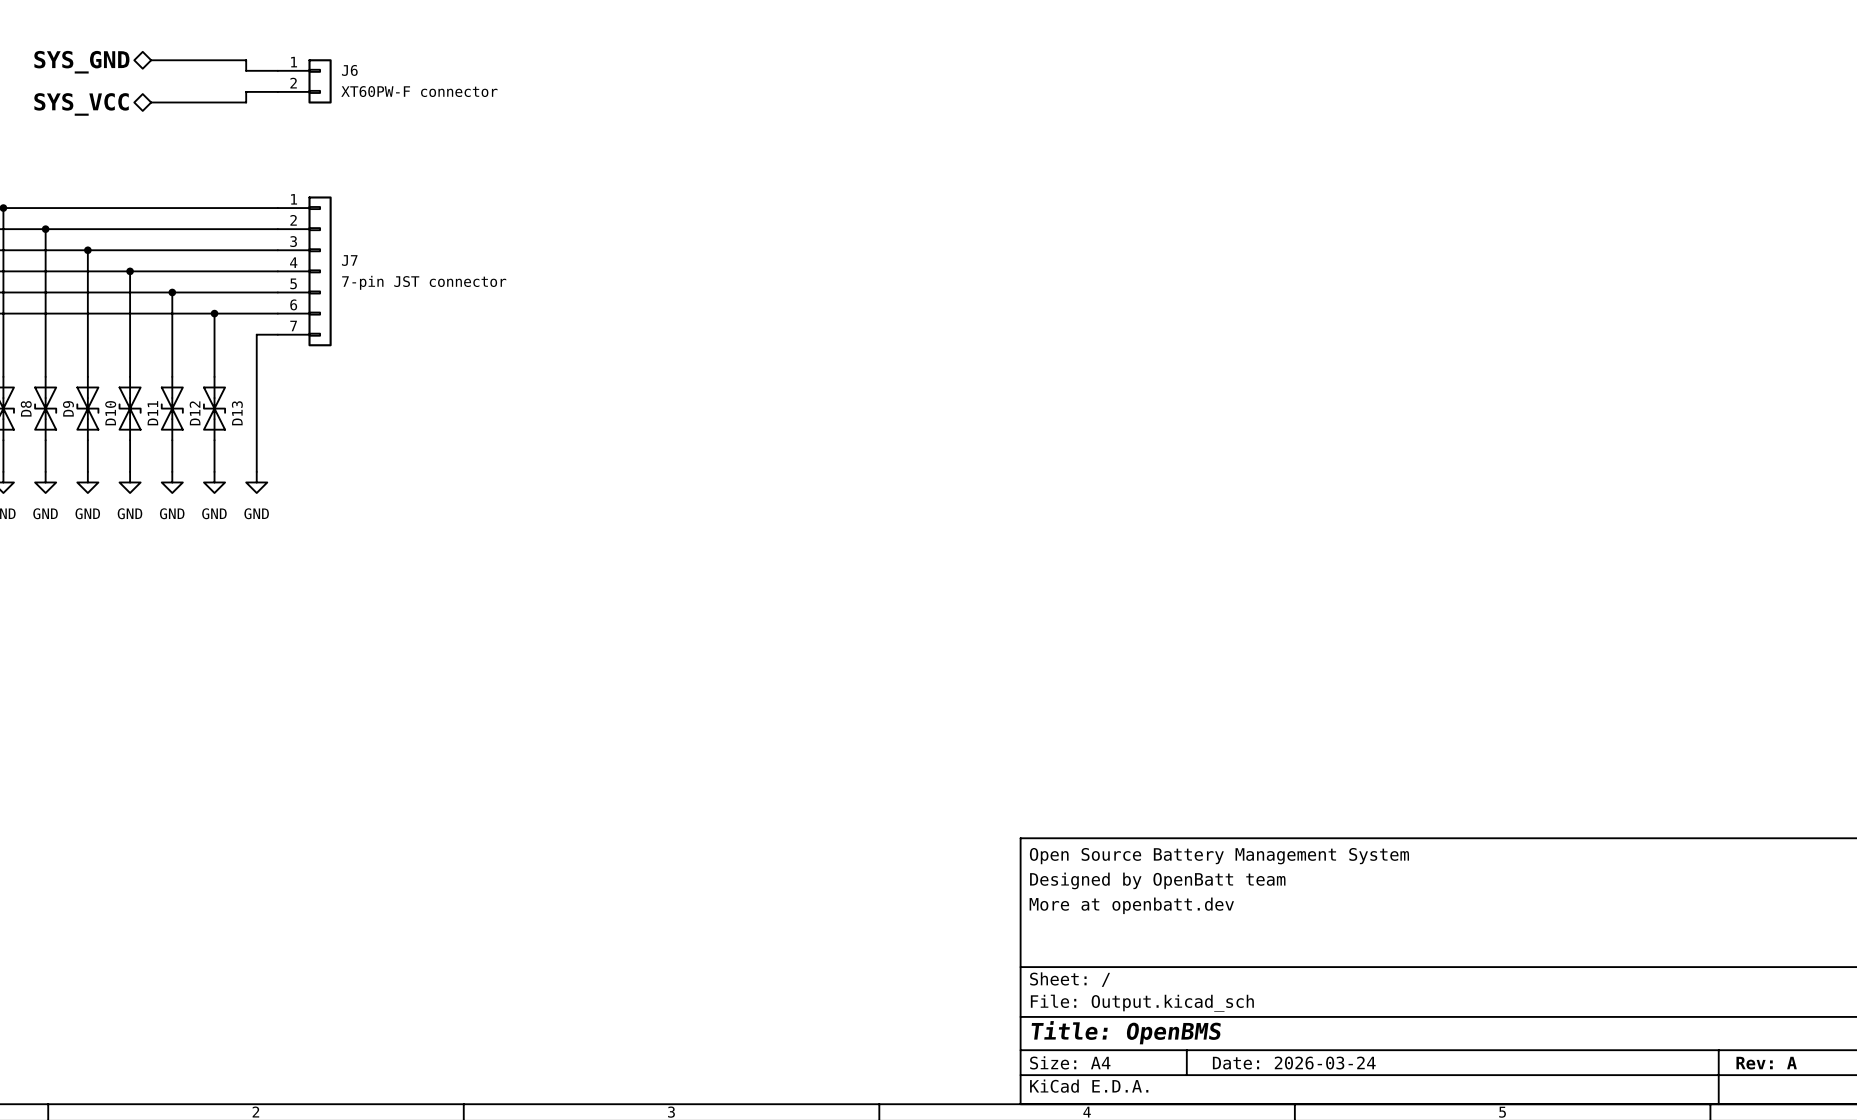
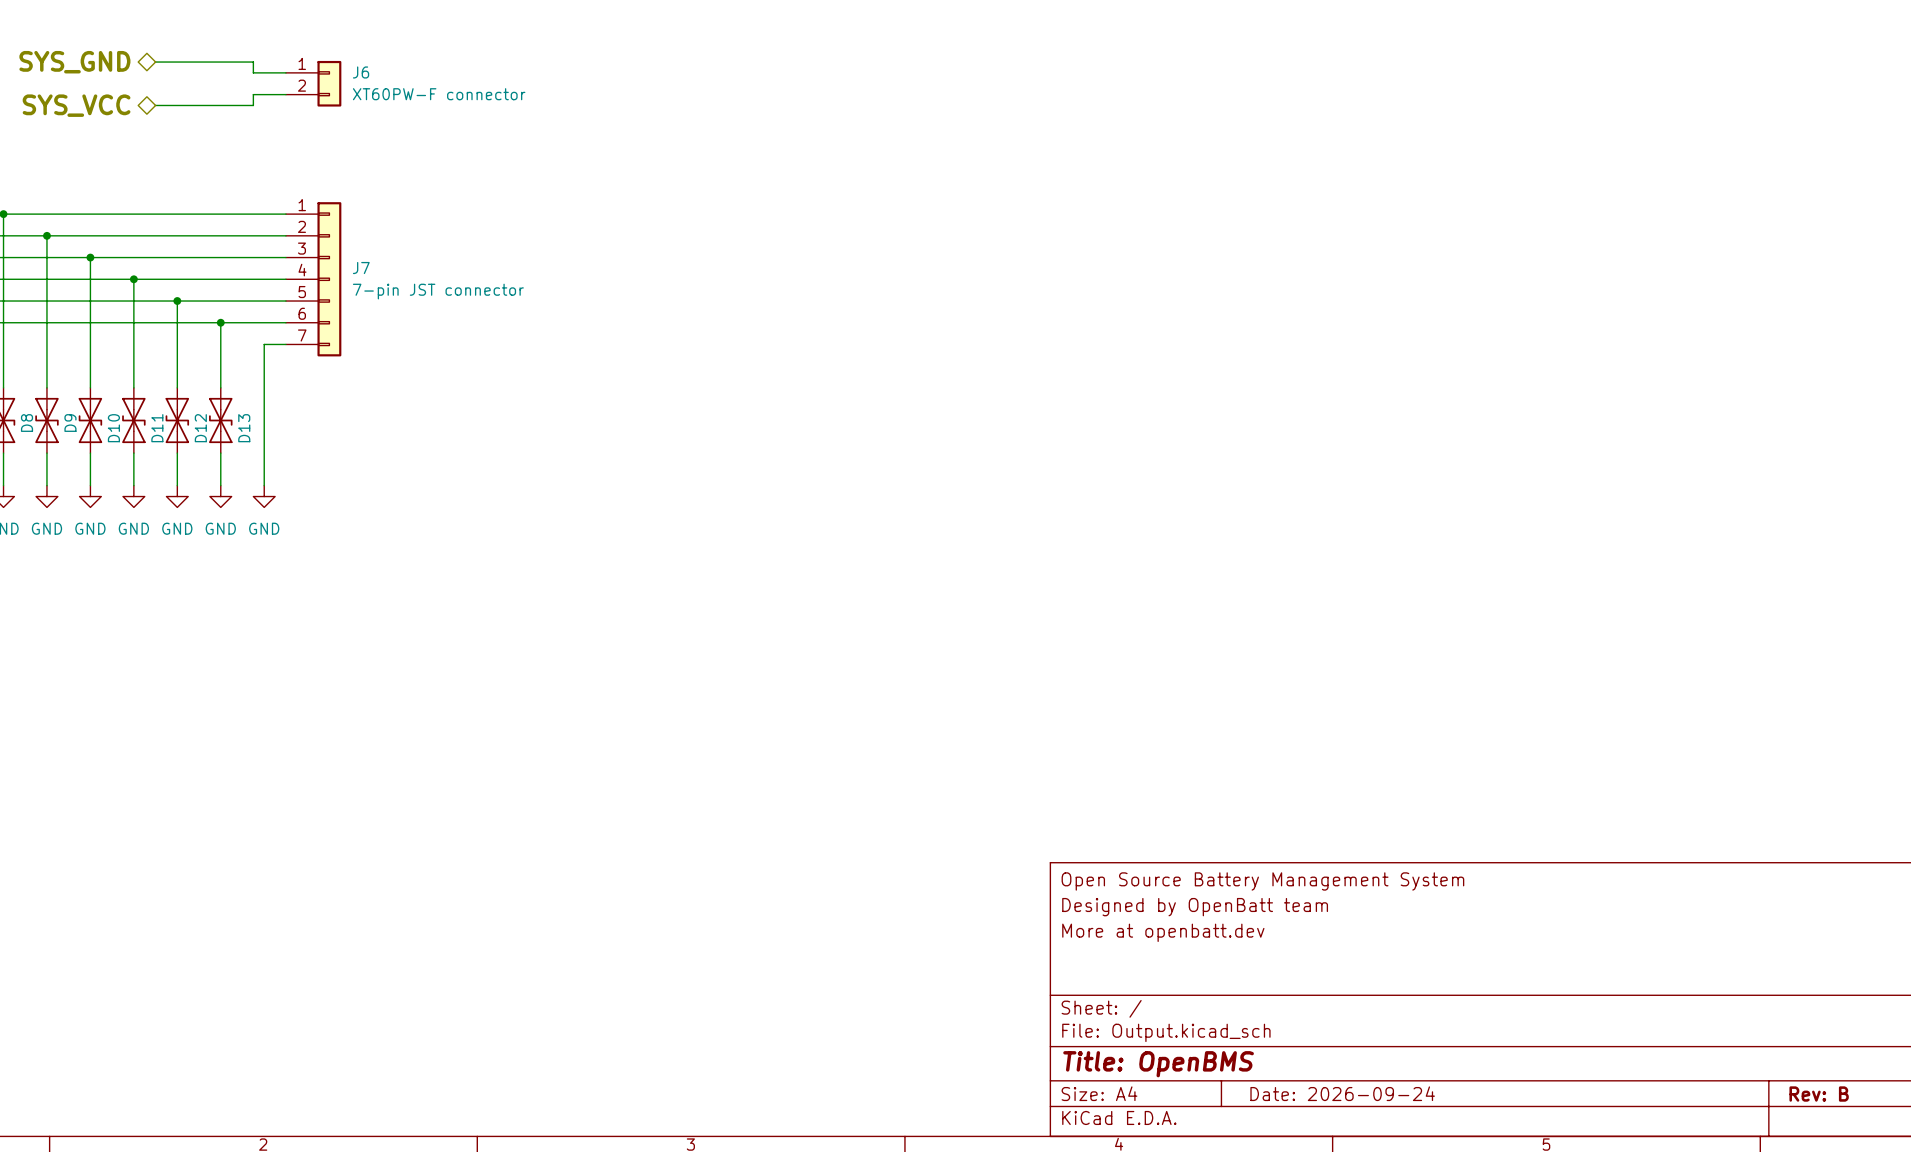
title block: Date: 2026-03-24 (1294, 1063) -> Date: 2026-09-24 (1342, 1093)
title block: Rev: A (1766, 1063) -> Rev: B (1819, 1094)

